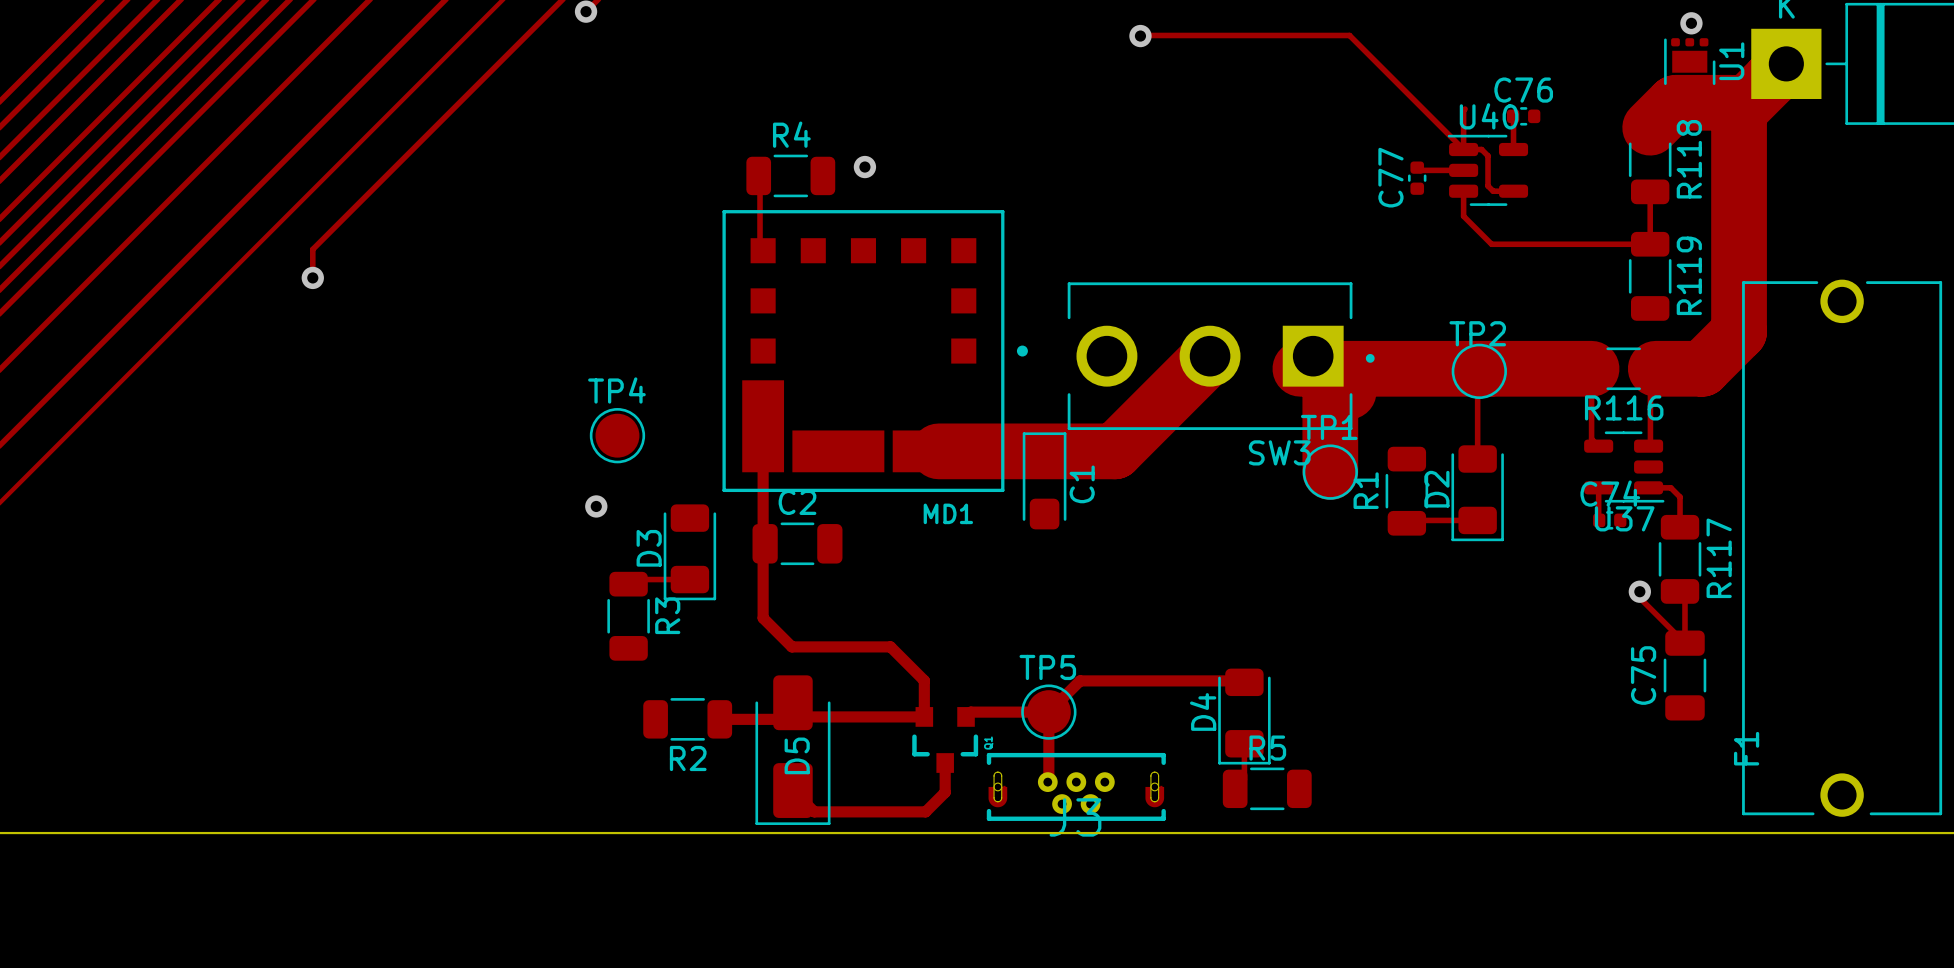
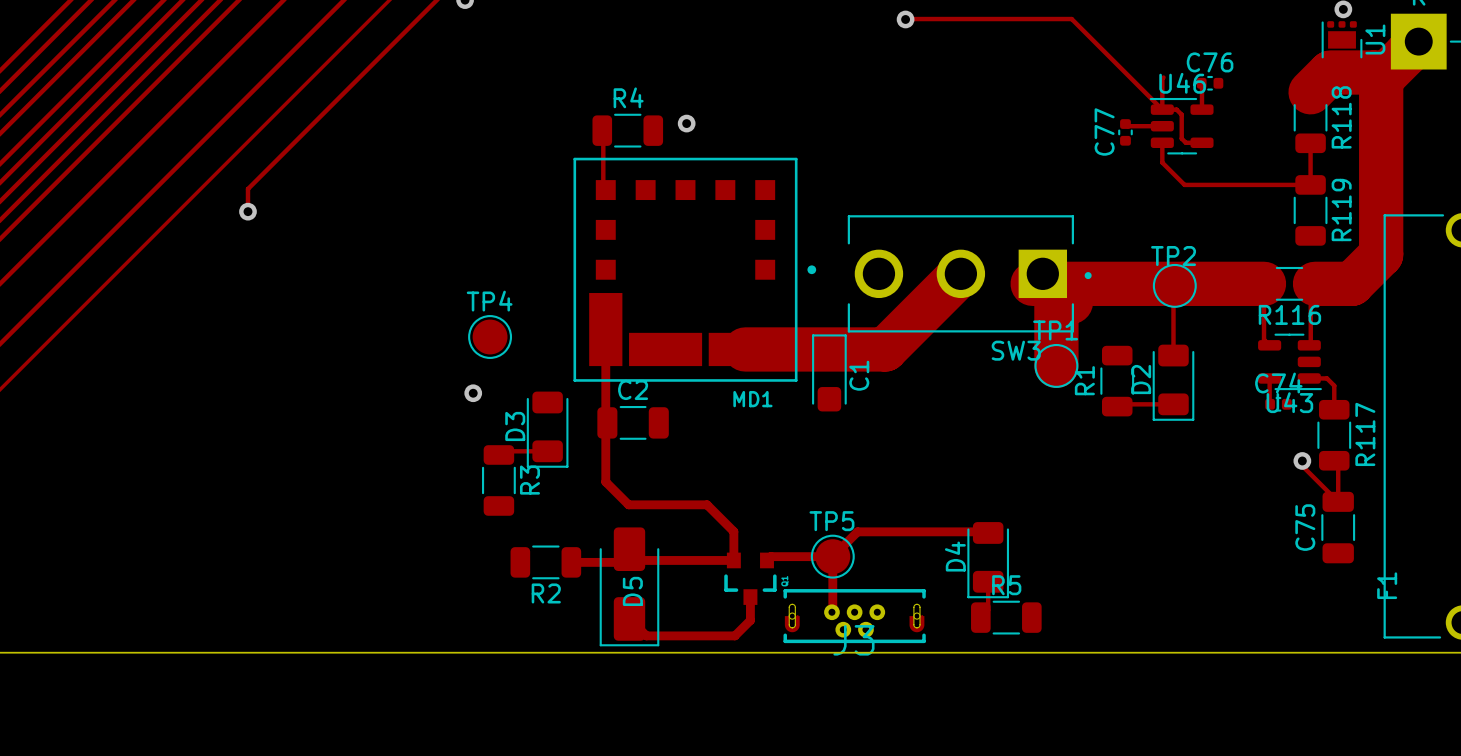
U40 name: U40 (1489, 116) -> U46 (1182, 83)
U37 name: U37 (1624, 518) -> U43 (1289, 402)

